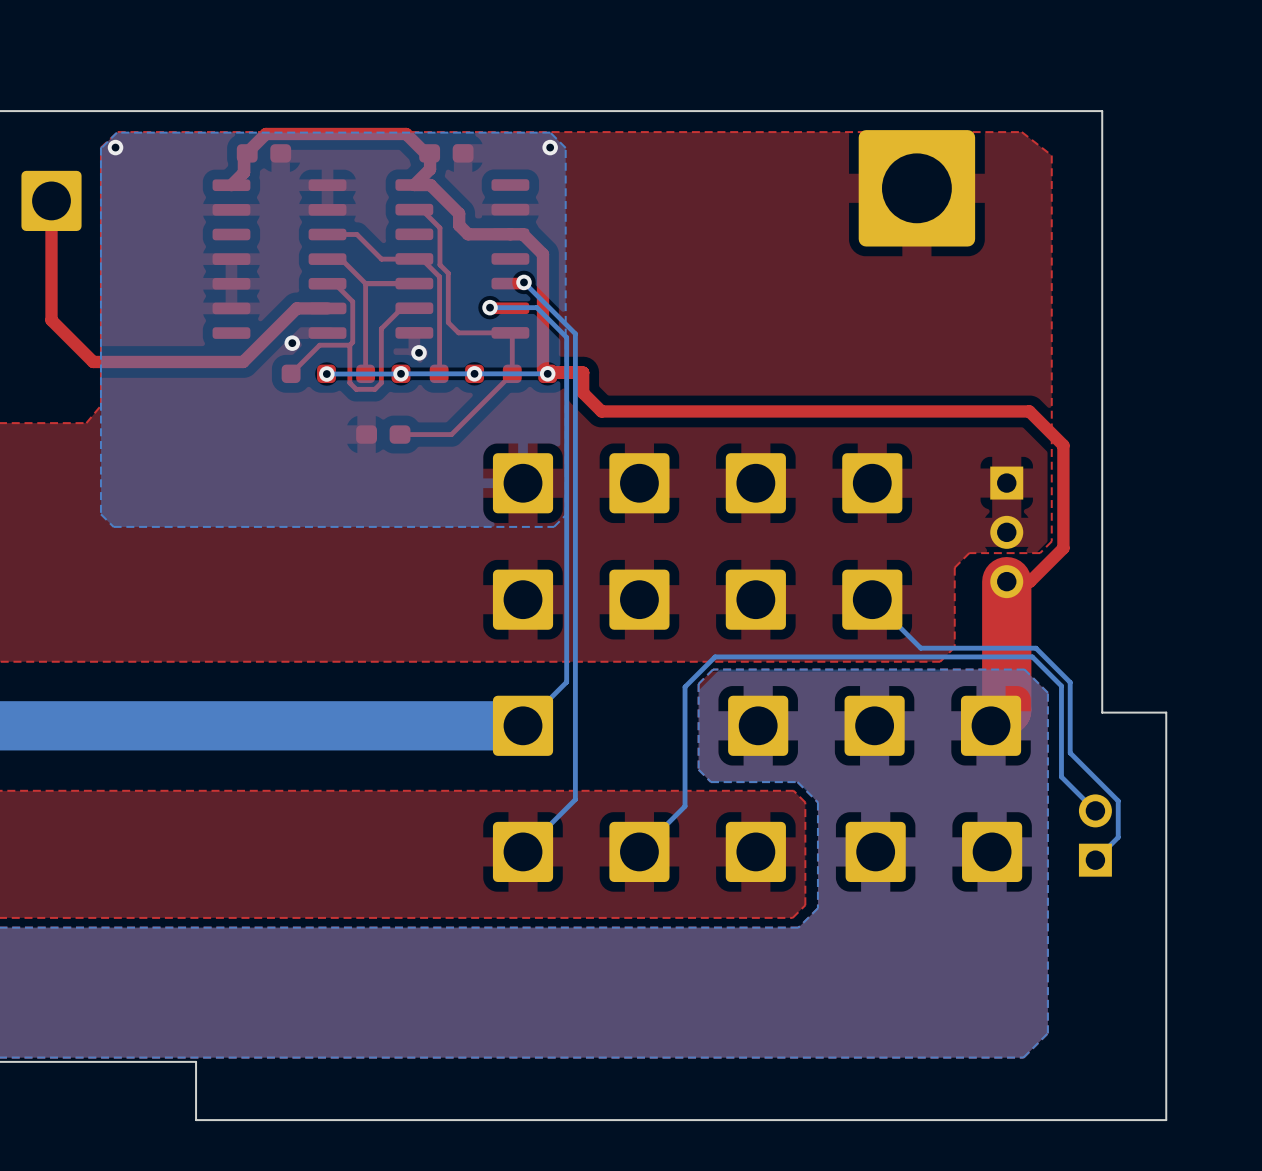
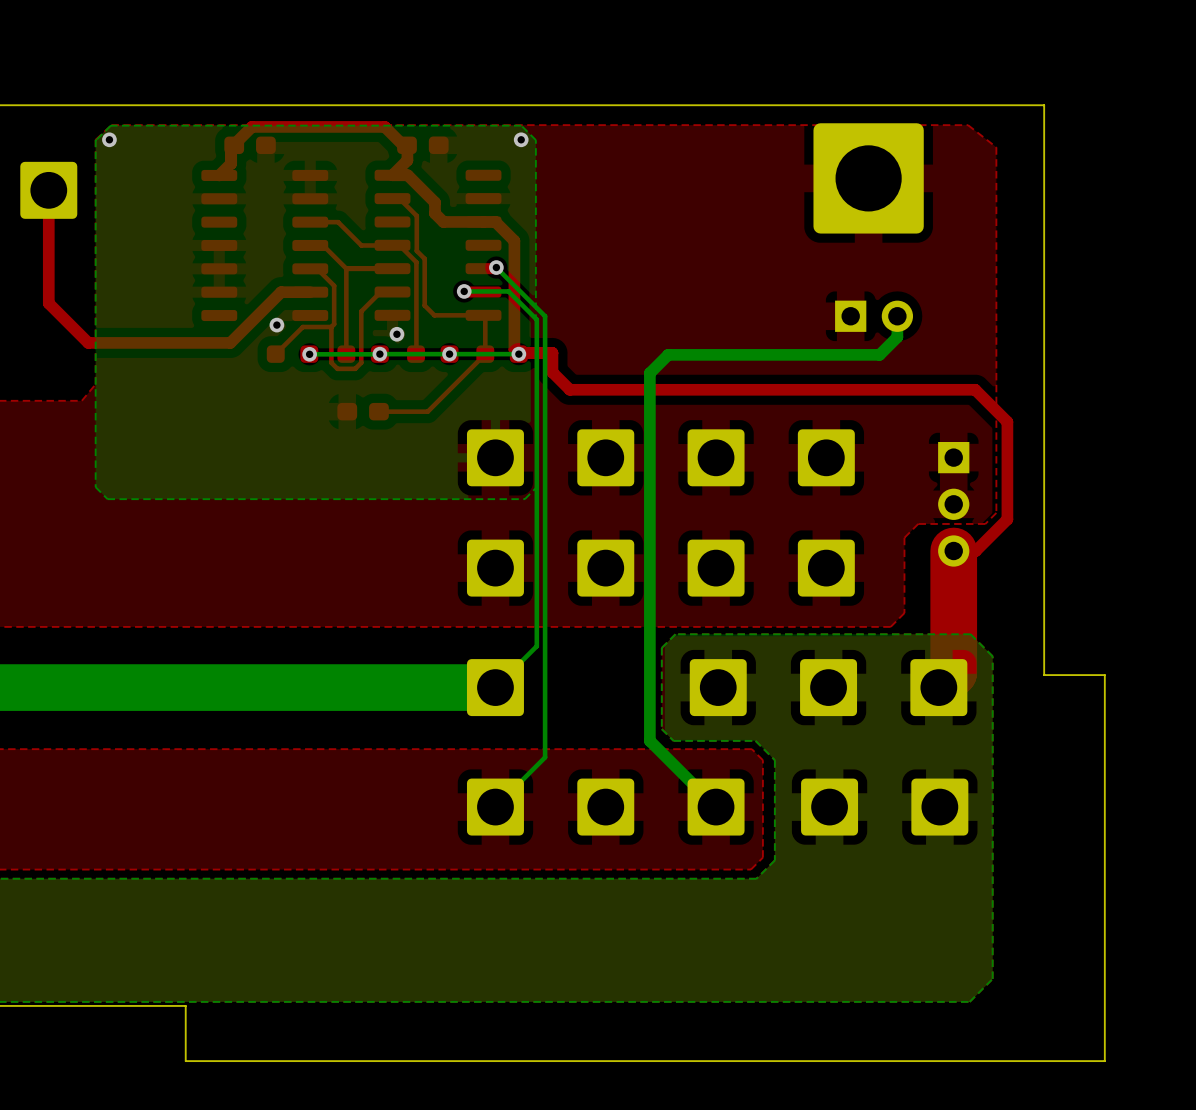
part: none -> (874, 316)
bottom track: none -> (897, 316) (897, 337) (879, 354) (668, 354) (649, 373) (649, 740) (716, 807)
bottom track: (872, 599) (920, 648) (1035, 648) (1070, 682) (1070, 752) (1118, 800) (1118, 837) (1095, 860) -> none
bottom track: (1095, 810) (1061, 776) (1061, 686) (1032, 656) (715, 656) (685, 687) (685, 806) (639, 851) -> none
part: (1095, 835) -> none

